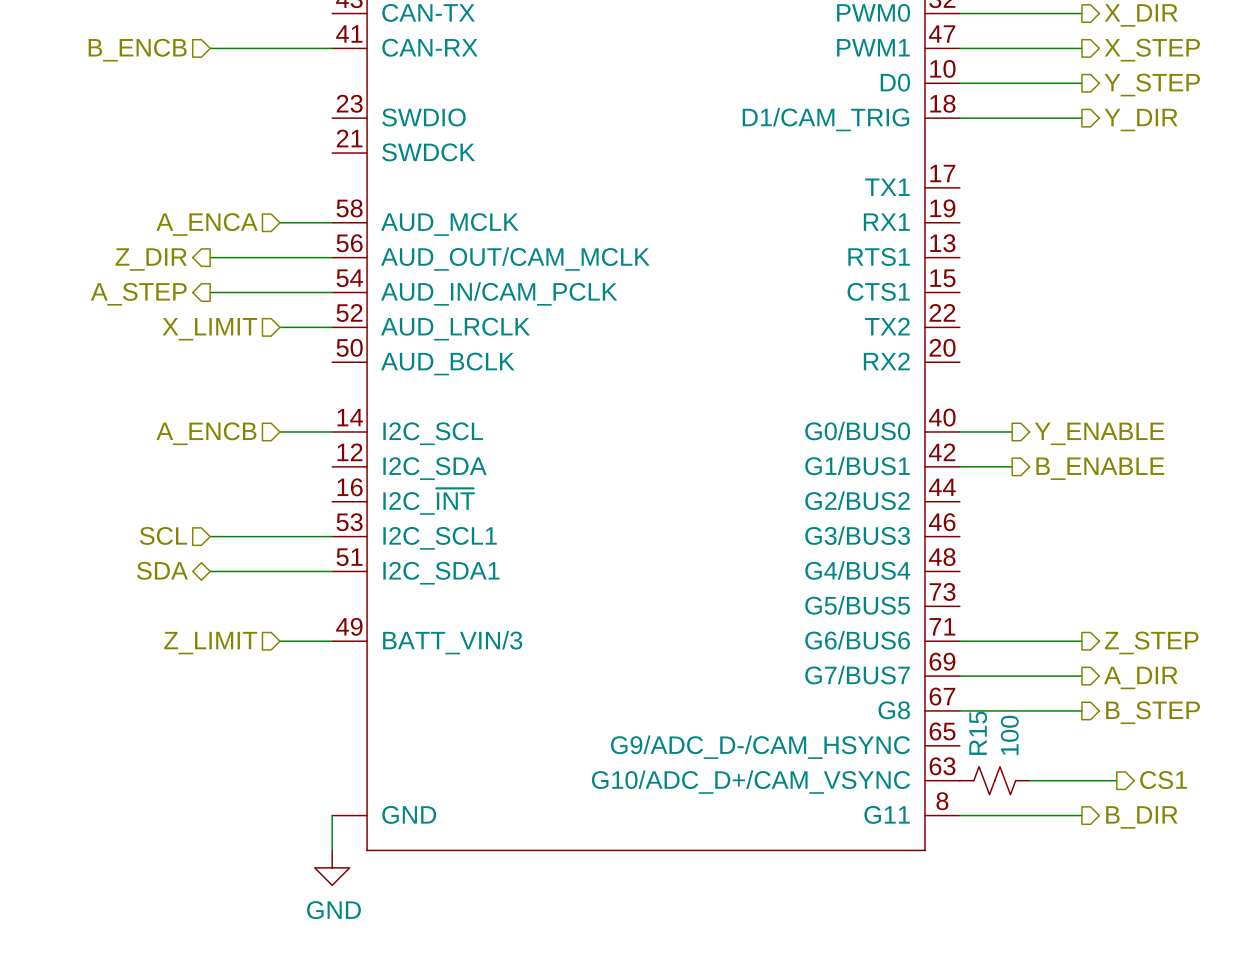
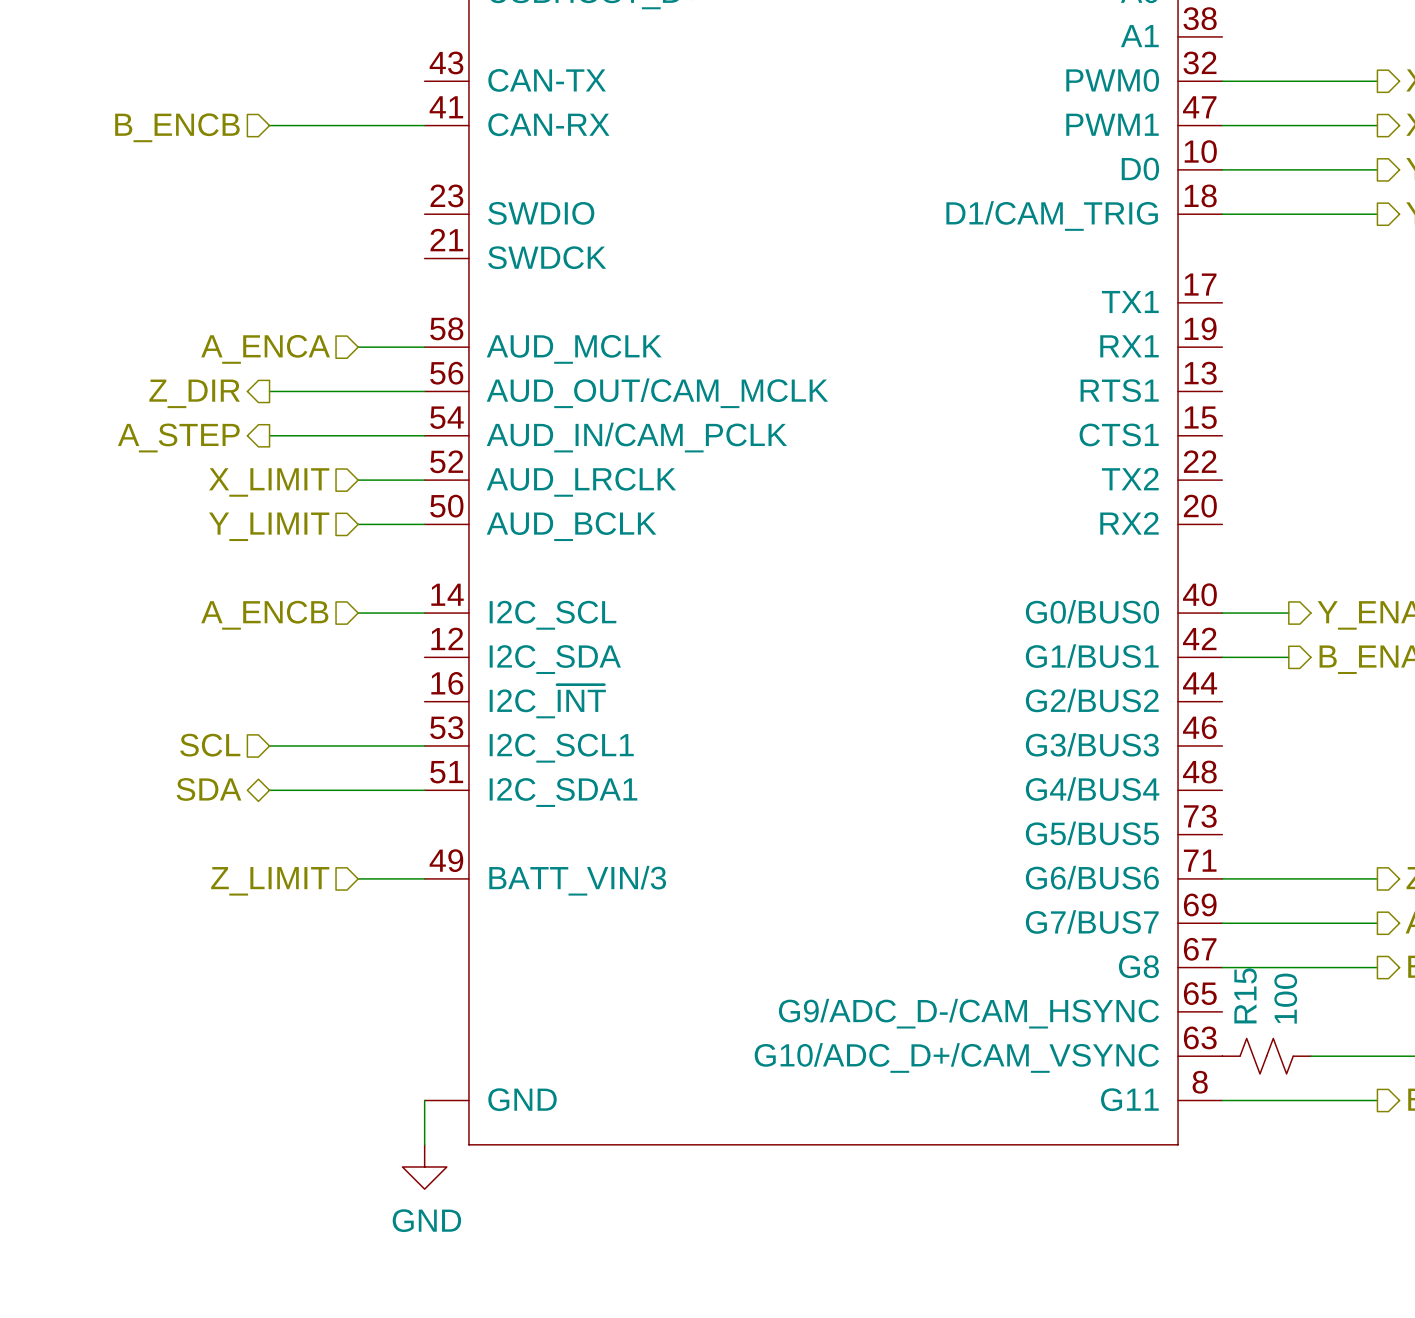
wire: none -> (358, 524) (424, 524)
hierarchical label: none -> Y_LIMIT (269, 526)

